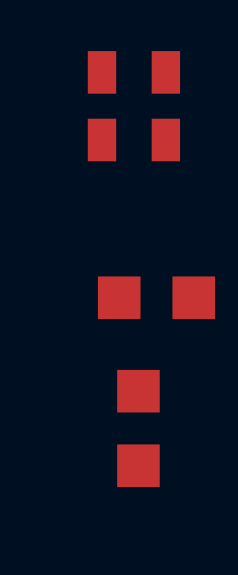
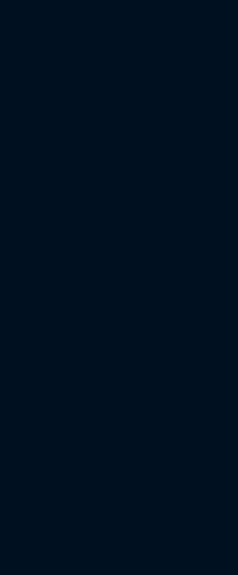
part: (133, 72) -> none
part: (133, 140) -> none
part: (156, 297) -> none
part: (138, 428) -> none

